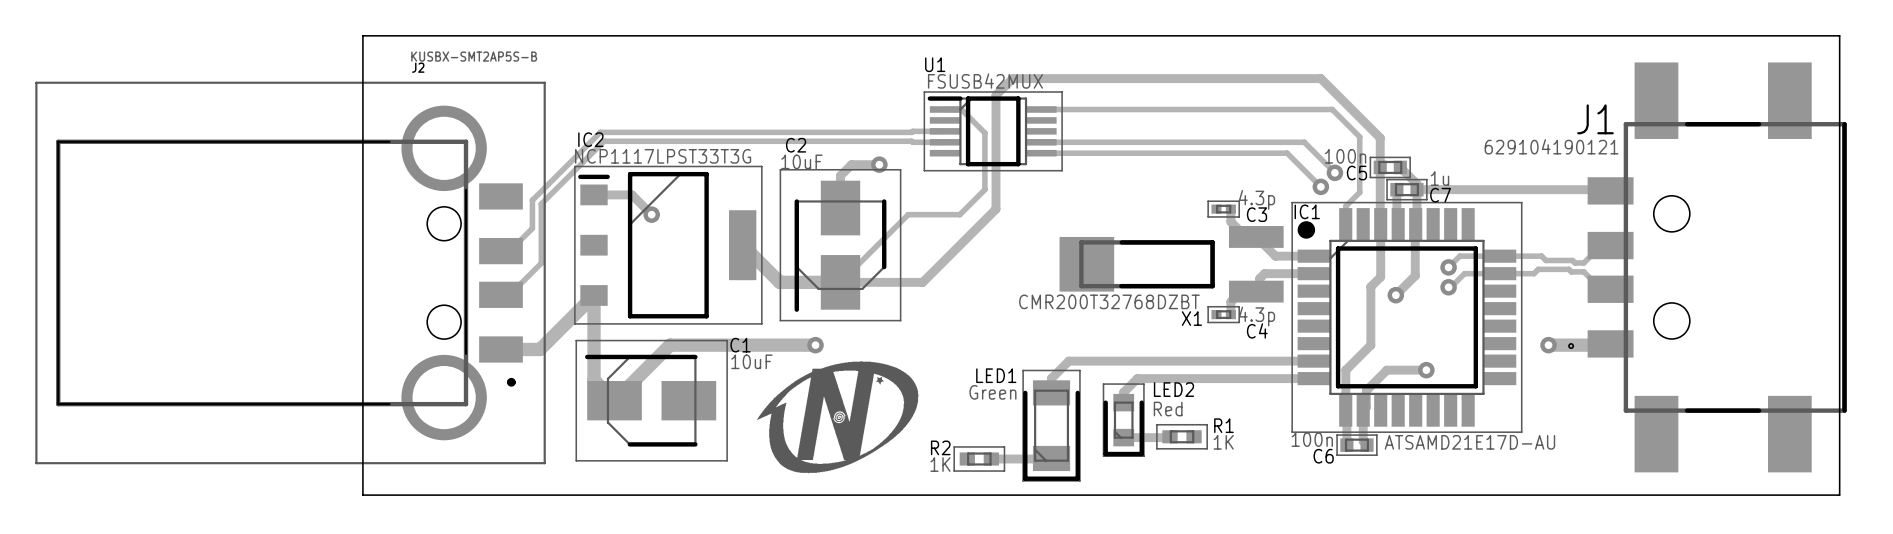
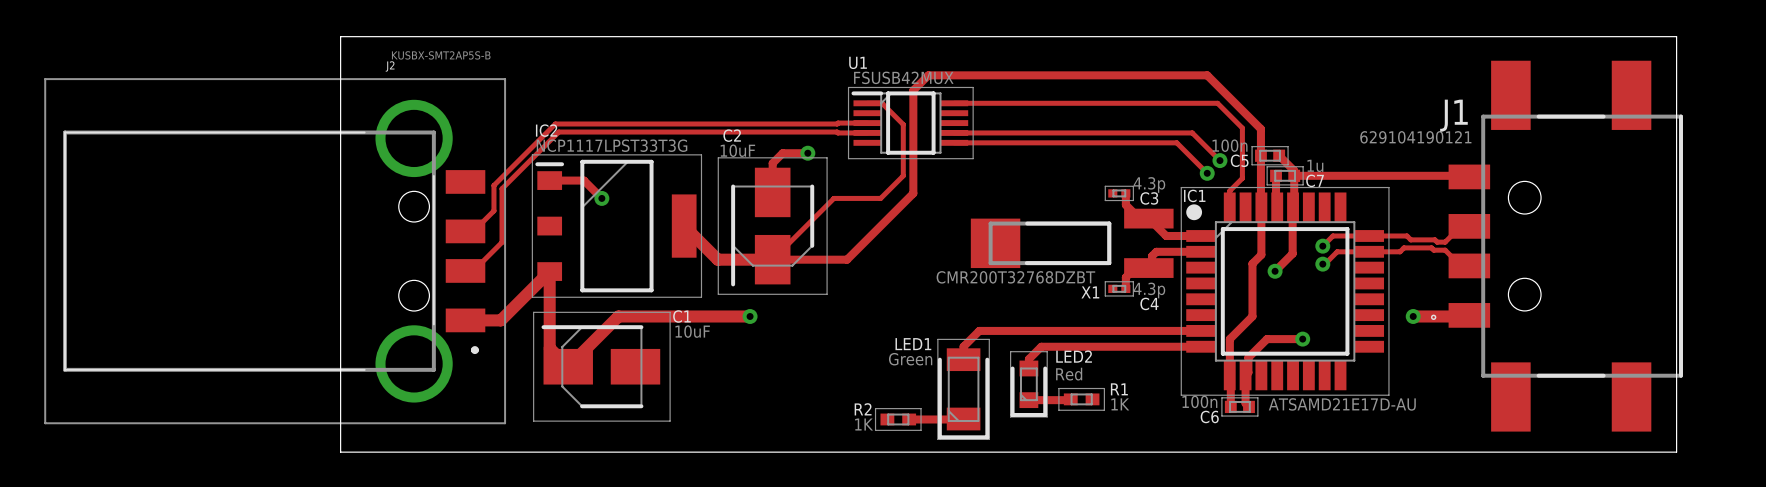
drawing: [757, 361, 919, 474] -> none

